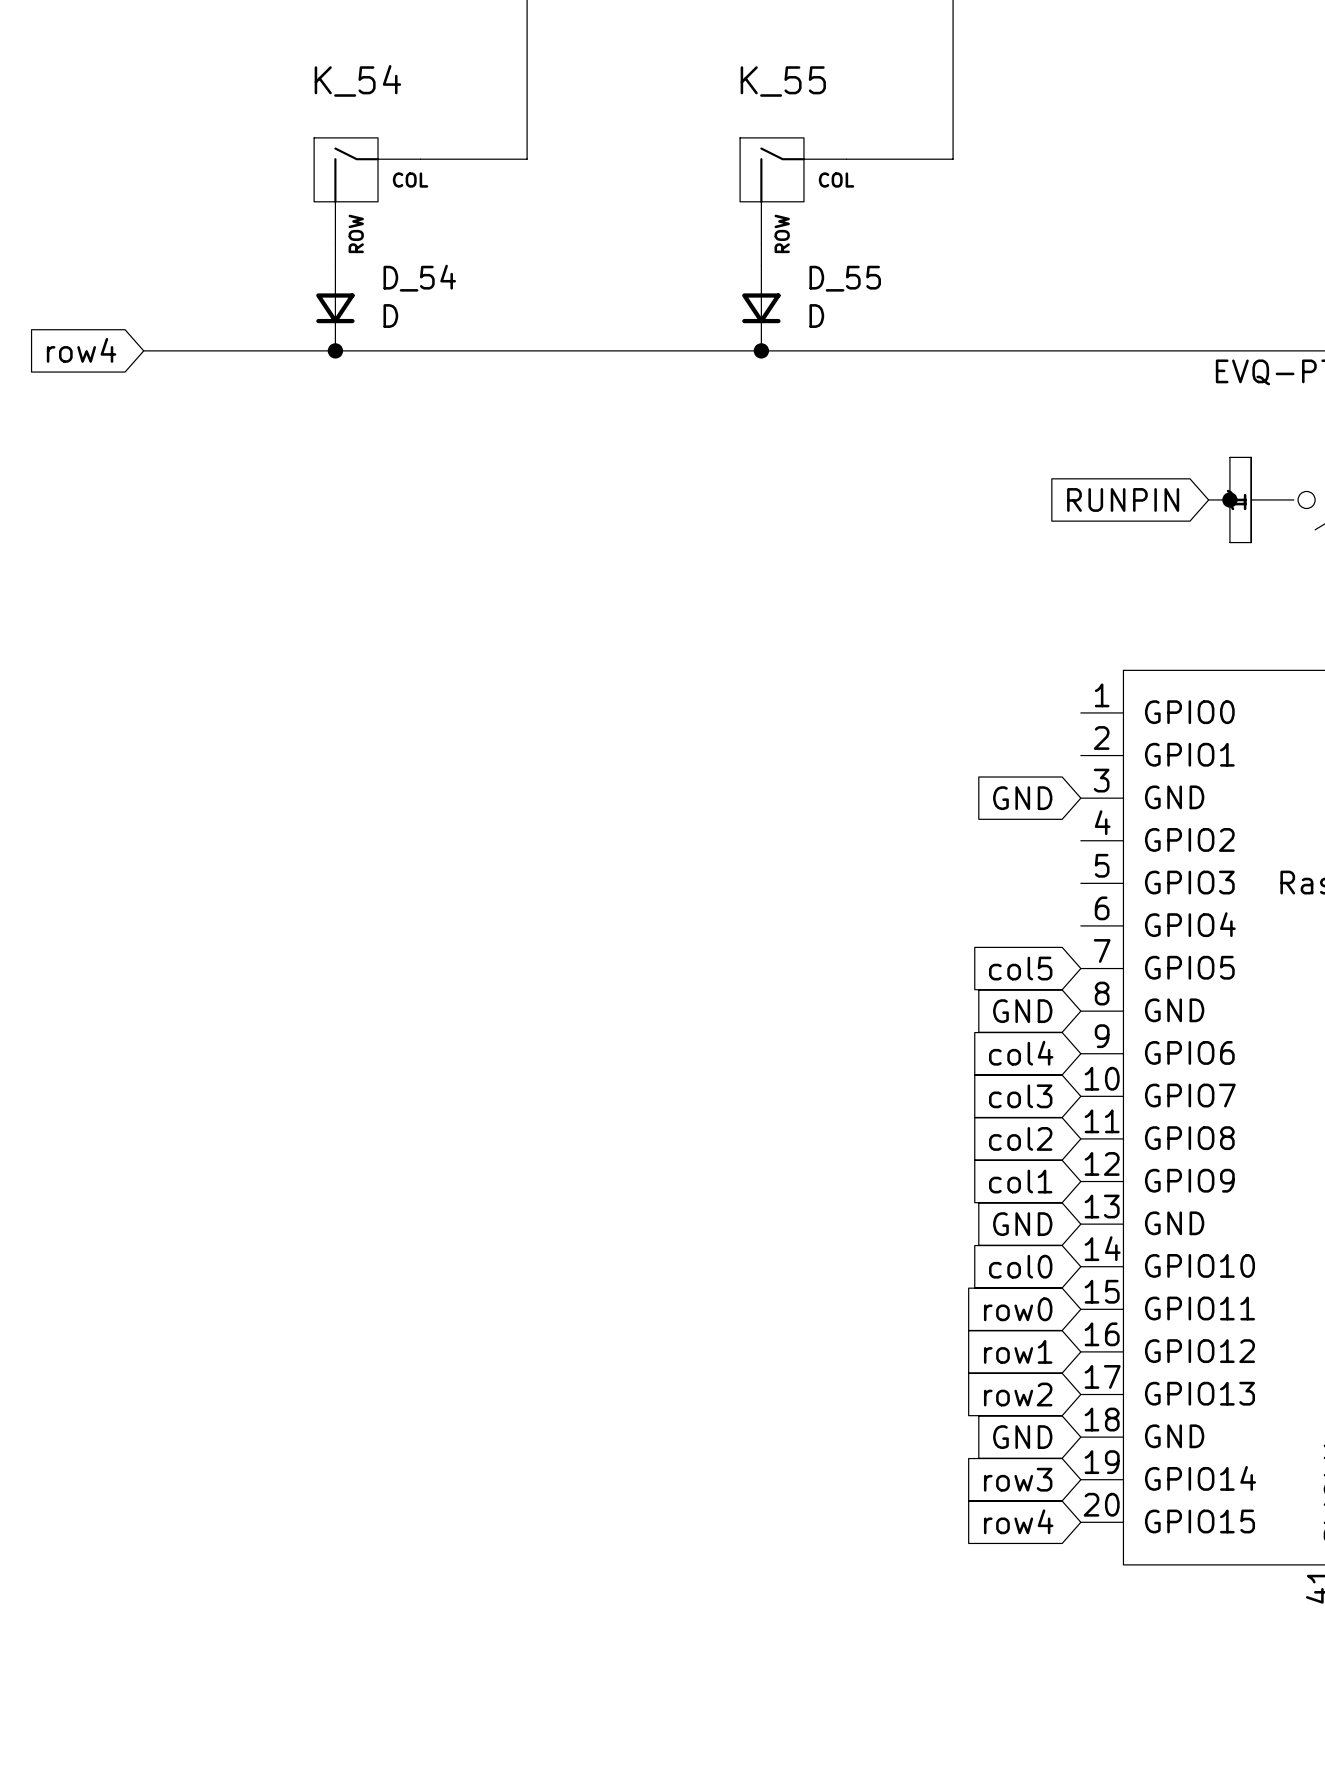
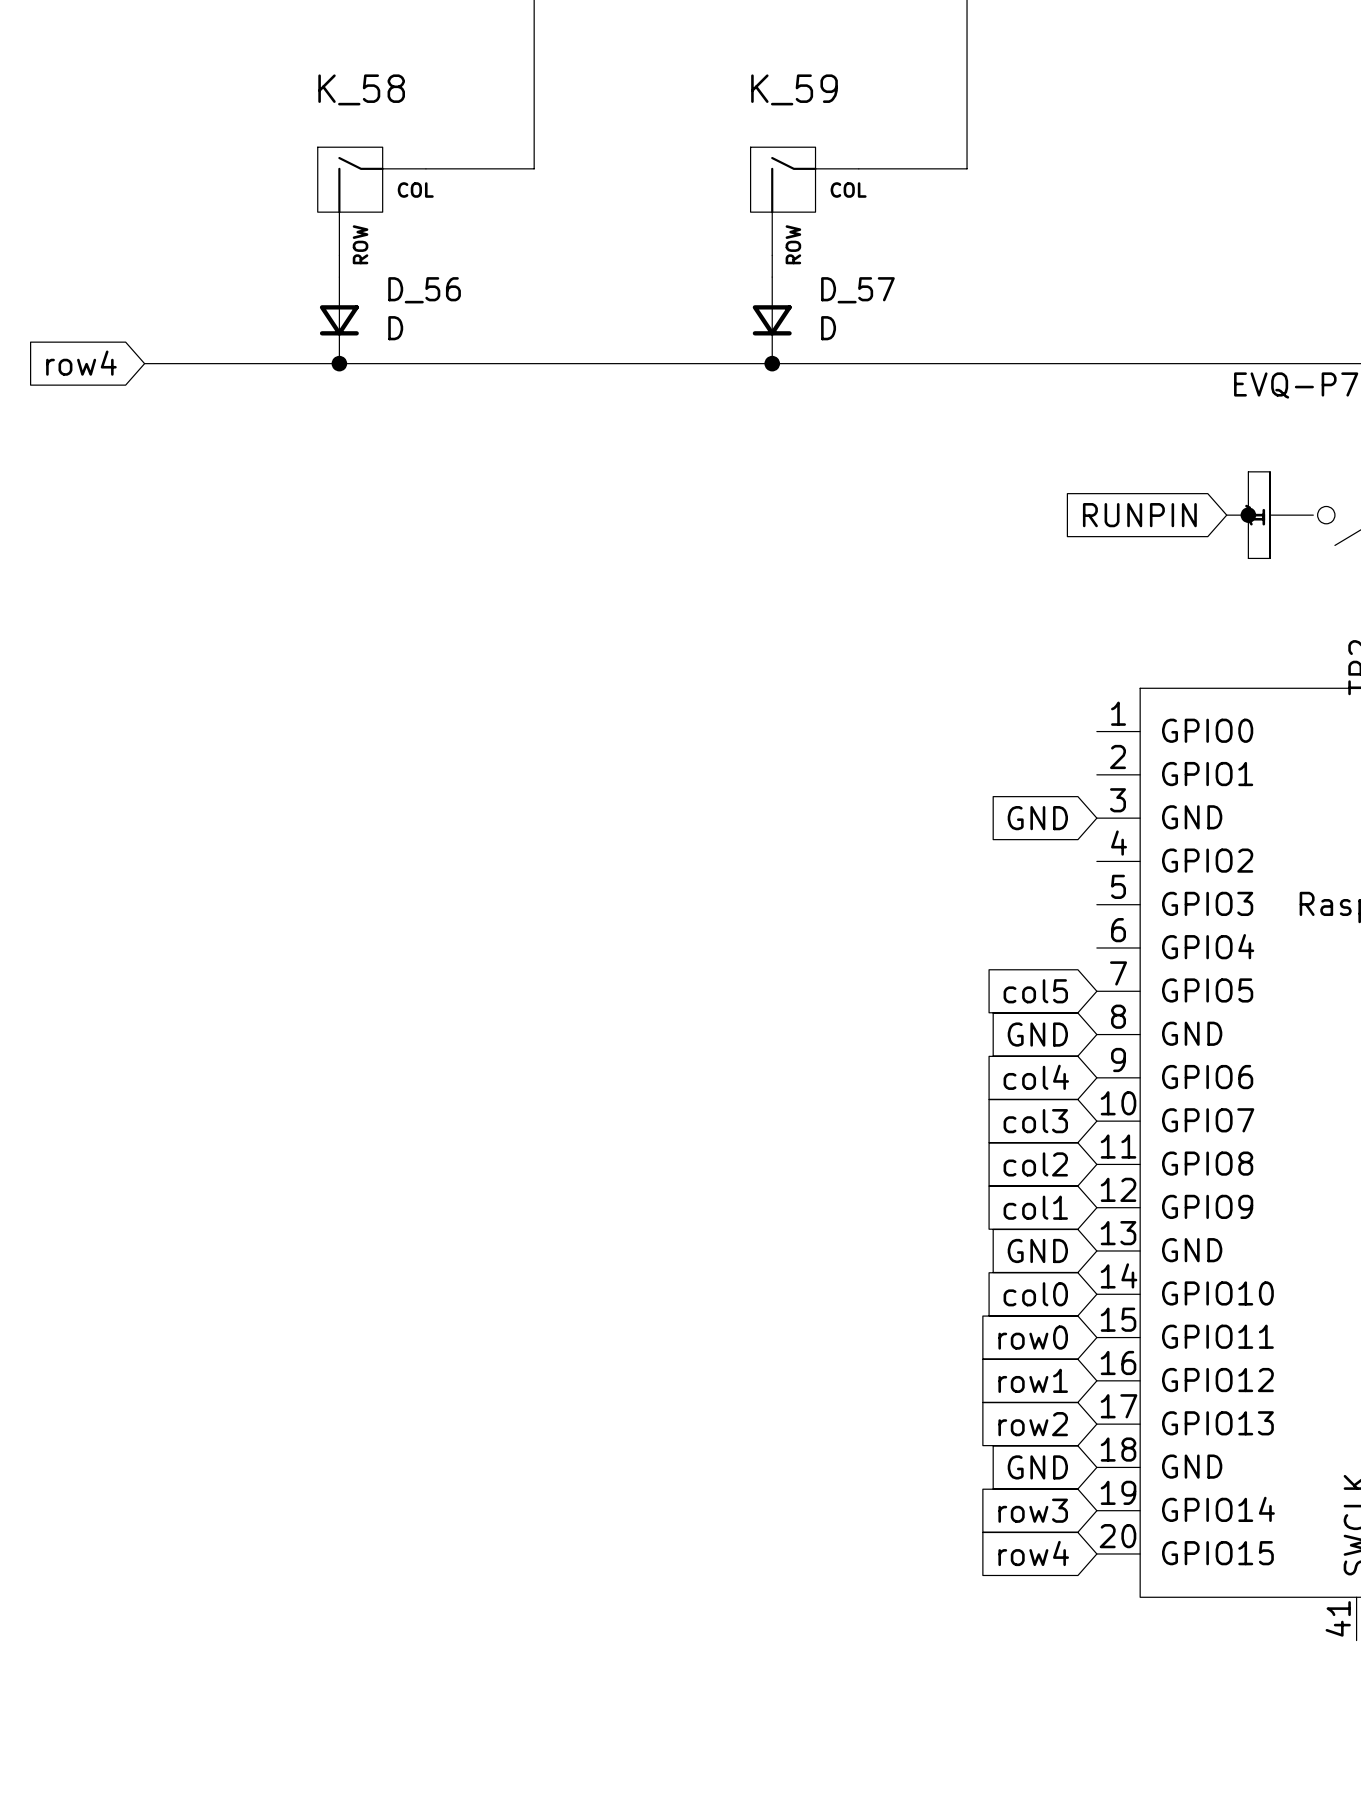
K_54 name: K_54 (357, 80) -> K_58 (361, 89)
K_55 name: K_55 (783, 81) -> K_59 (794, 89)
D_54 name: D_54 (419, 278) -> D_56 (424, 290)
D_55 name: D_55 (845, 278) -> D_57 (857, 290)

